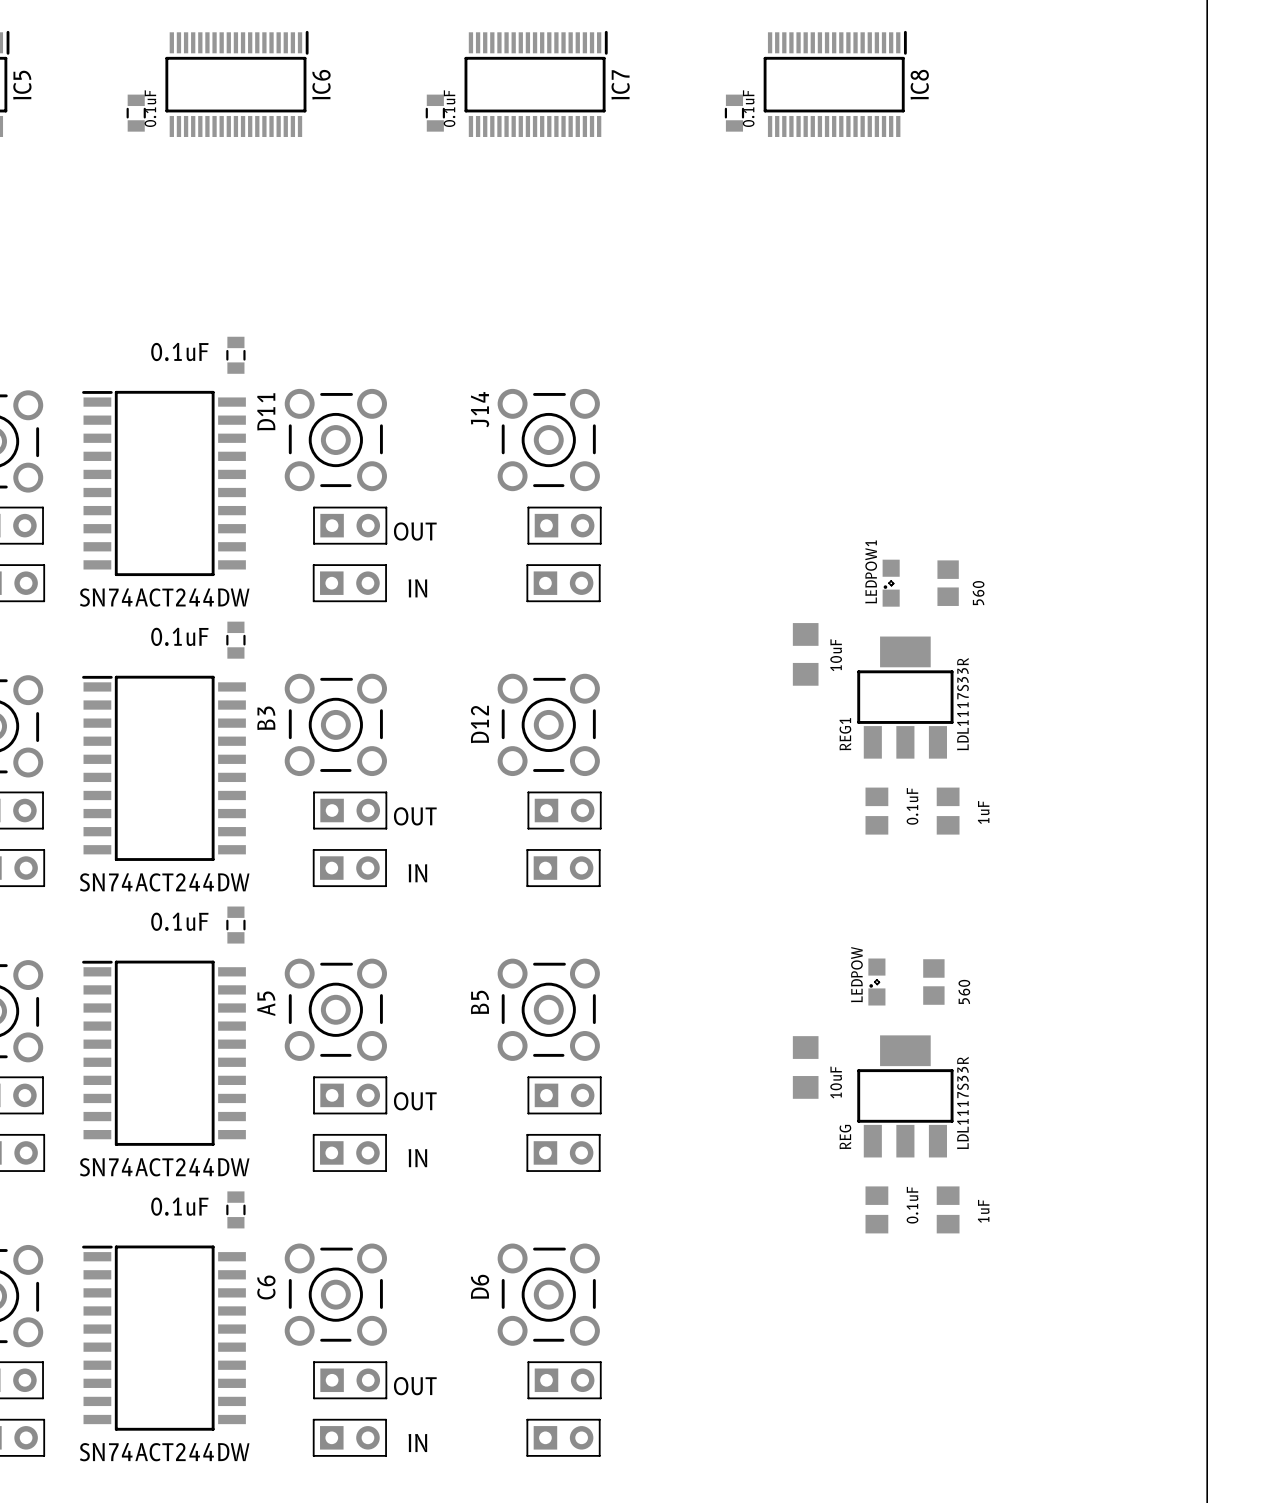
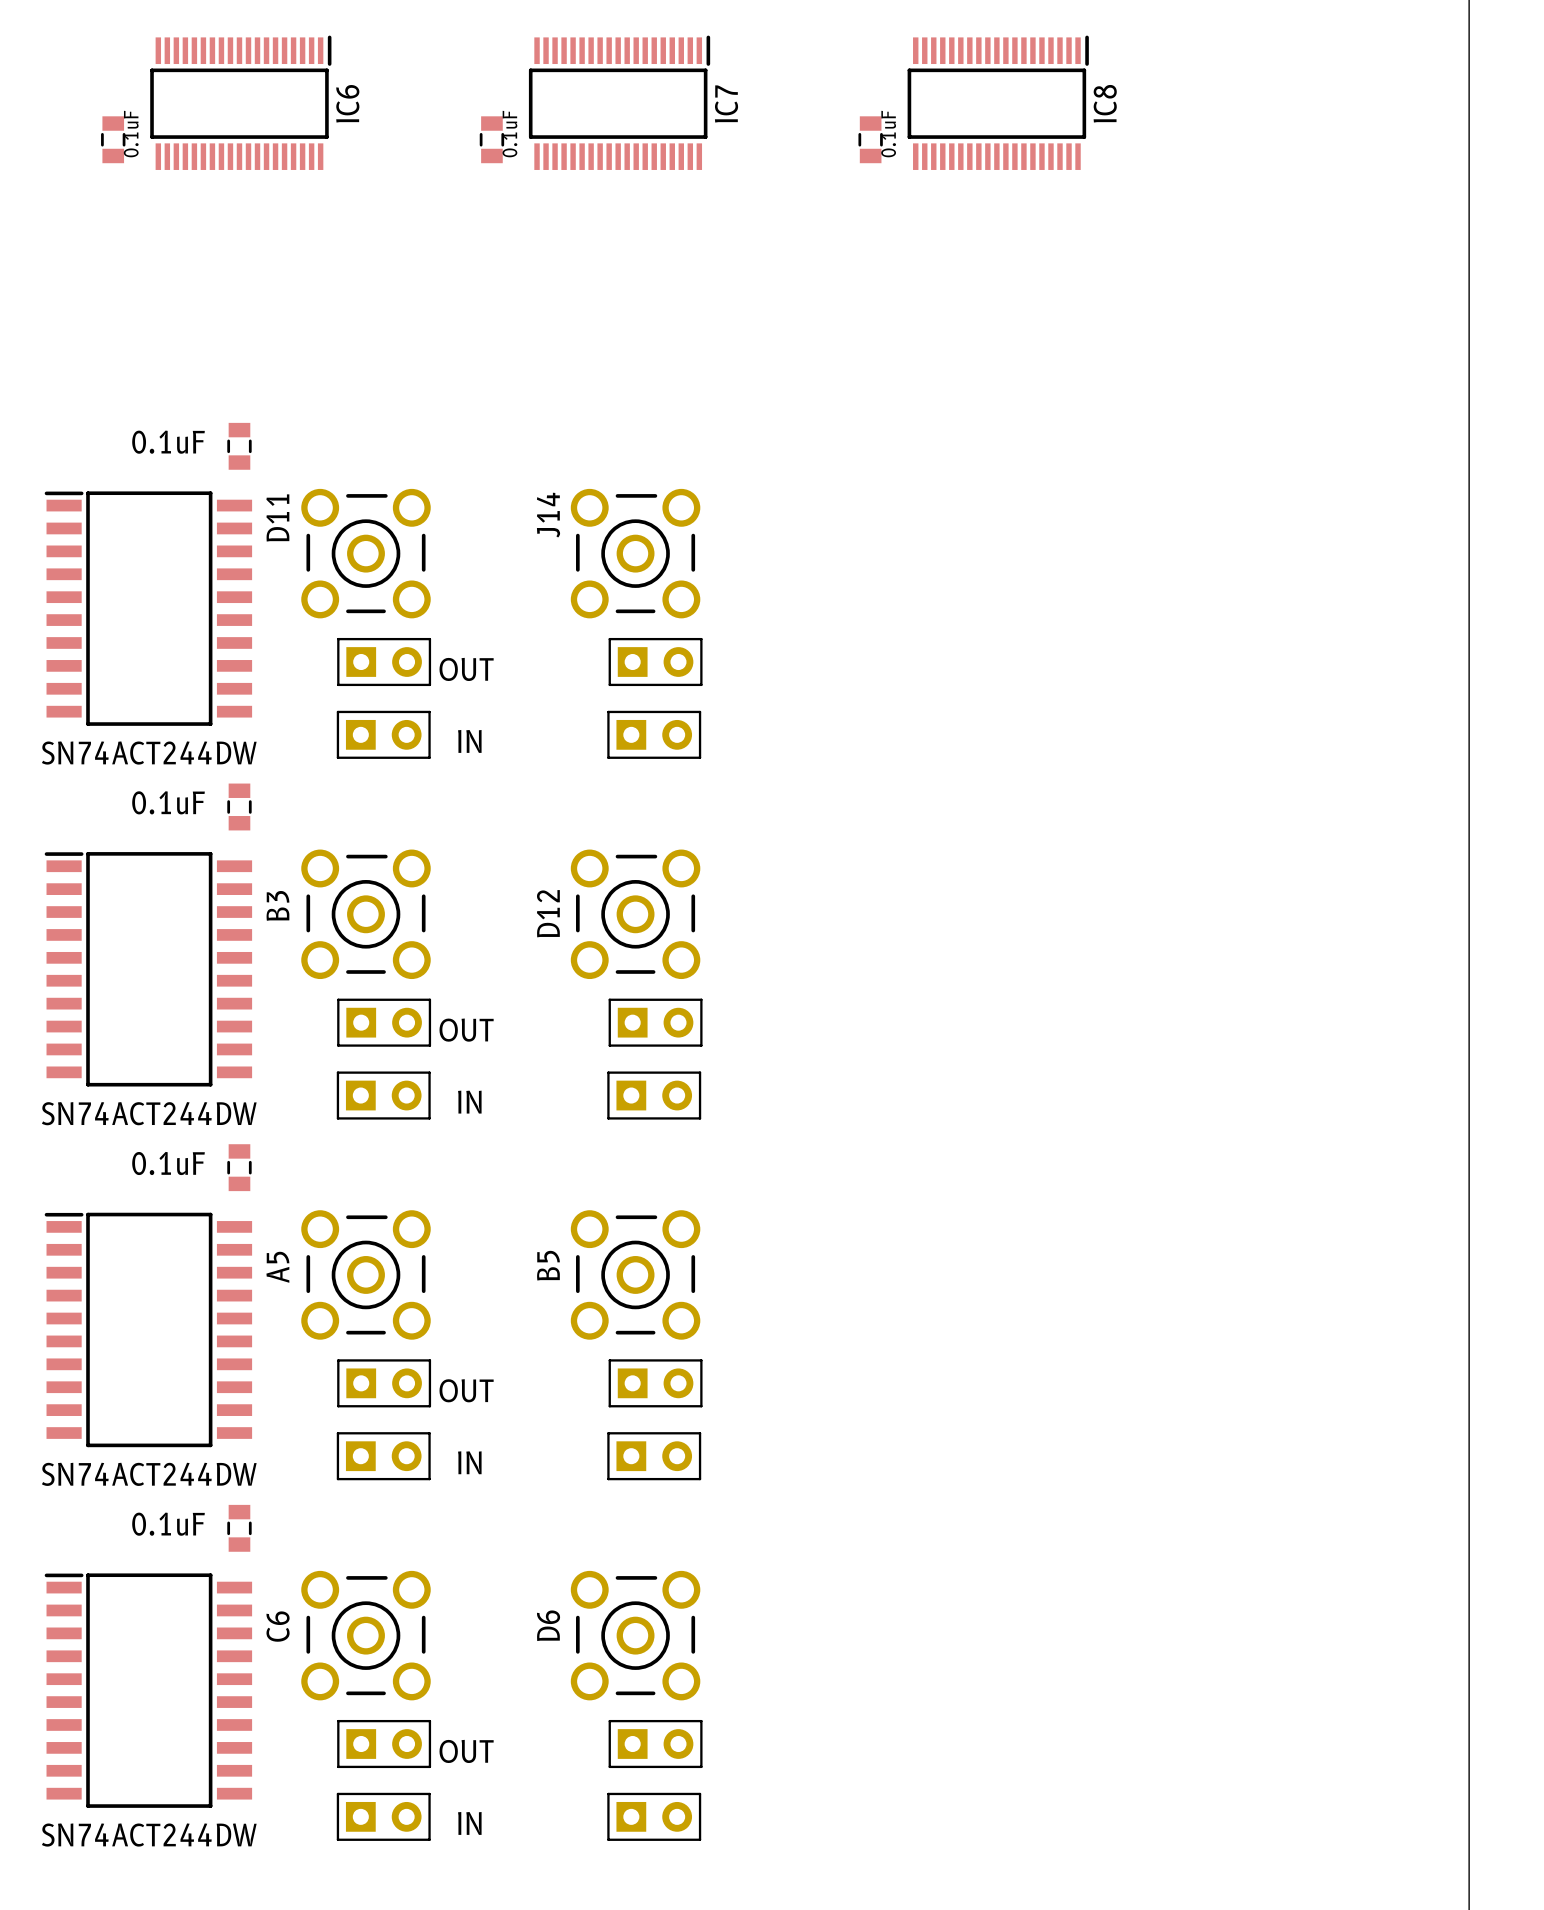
LEDPOW1: (891, 583) -> none
part: 560 (948, 583) -> none
part: 10uF (805, 654) -> none
REG1: LDL1117S33R (905, 697) -> none
part: 0.1uF (876, 811) -> none
part: 1uF (948, 811) -> none
LEDPOW: (876, 982) -> none
part: 560 (933, 982) -> none
part: 10uF (805, 1067) -> none
REG: LDL1117S33R (905, 1096) -> none
part: 0.1uF (876, 1209) -> none
part: 1uF (948, 1209) -> none

